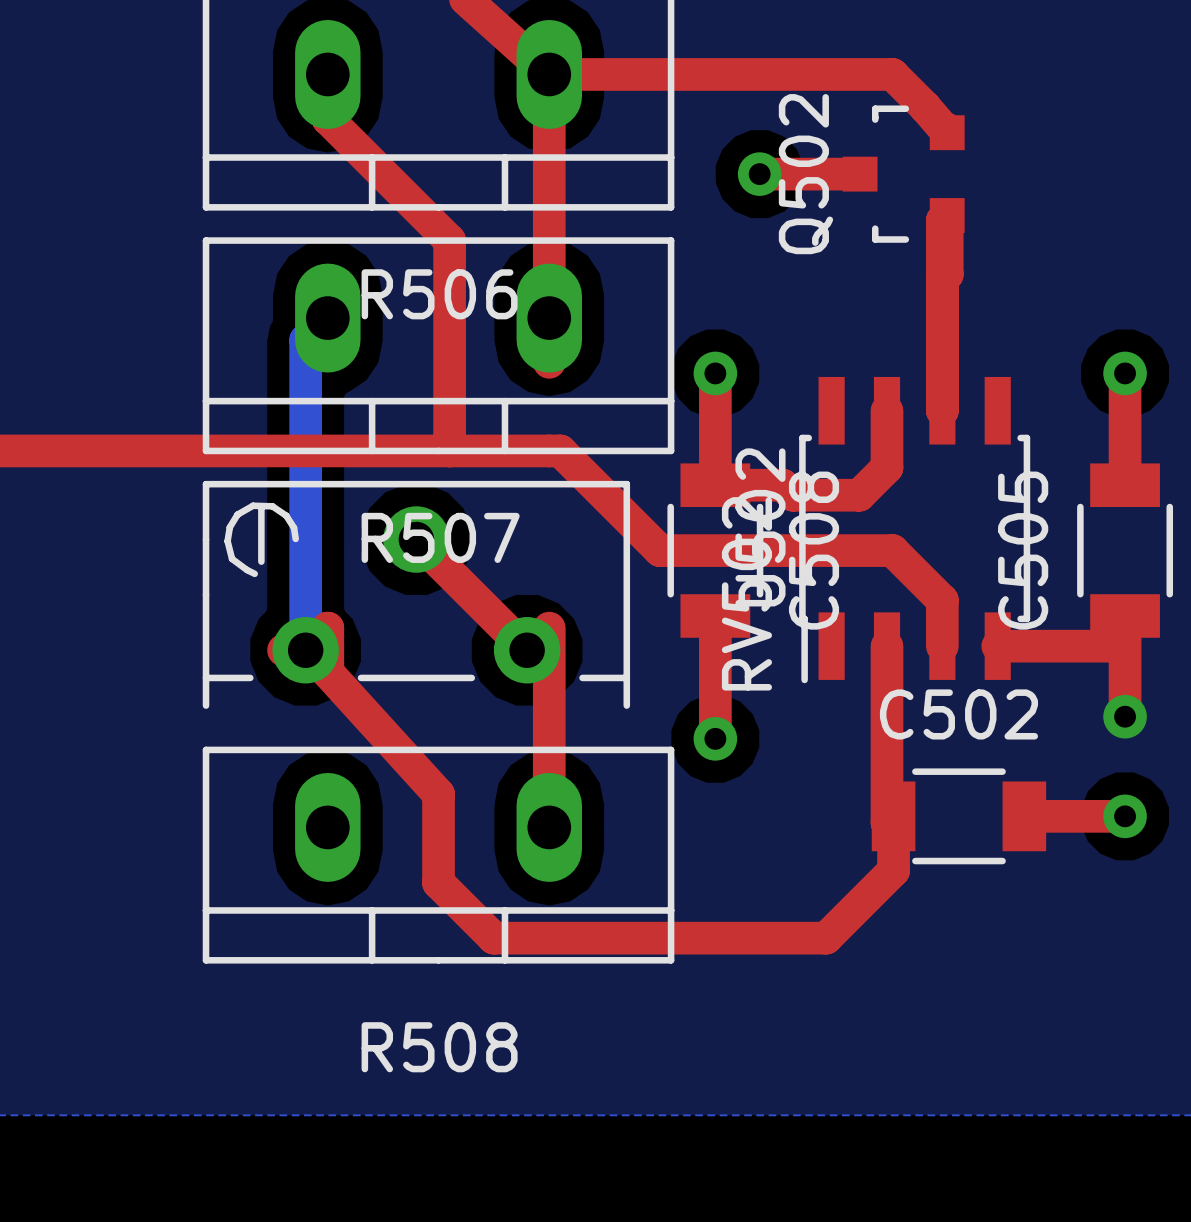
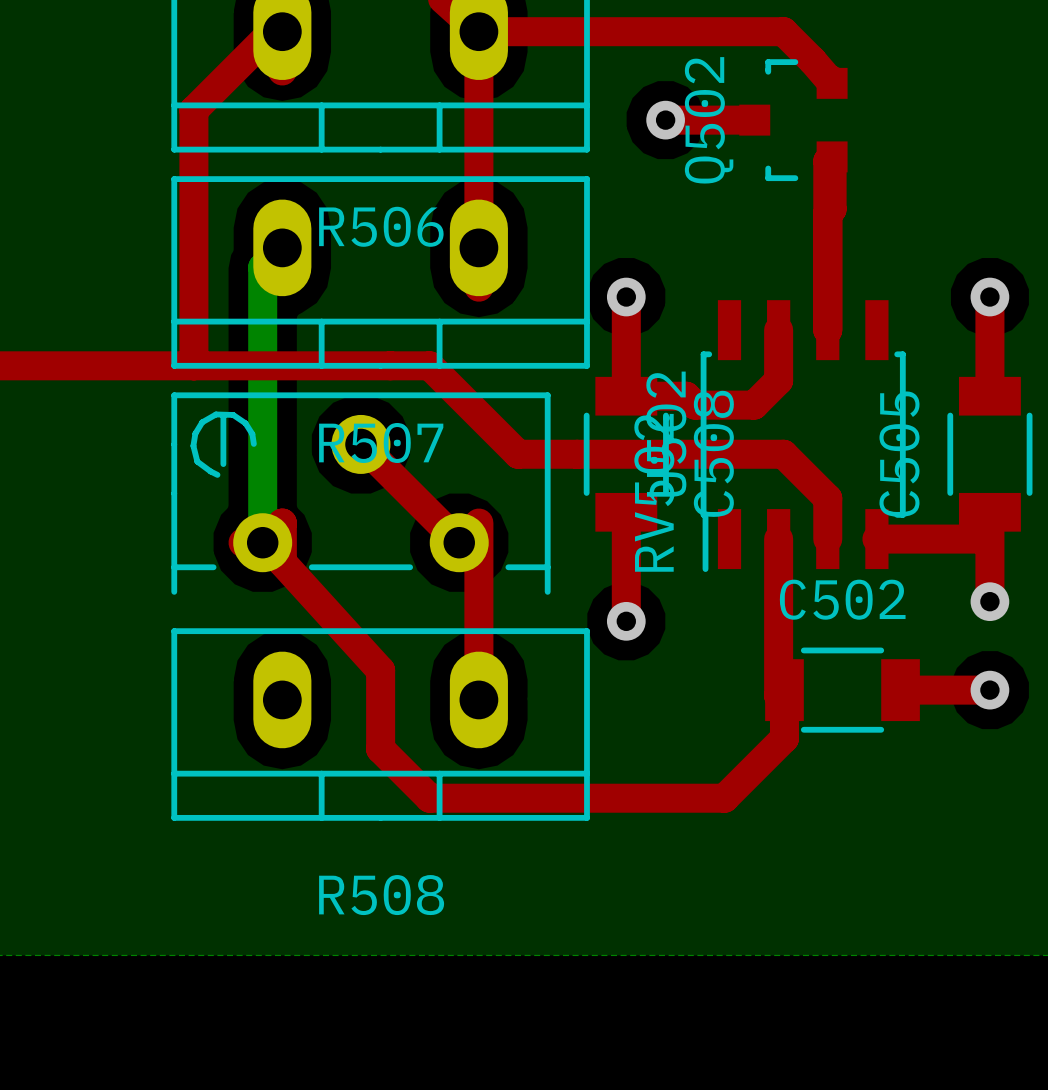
top track: none -> (282, 31) (272, 31) (193, 110) (193, 365)
top track: (327, 118) (449, 240) (449, 450) -> none
top track: (493, 450) (560, 450) (660, 550) -> (429, 365) (518, 454) (577, 454)

